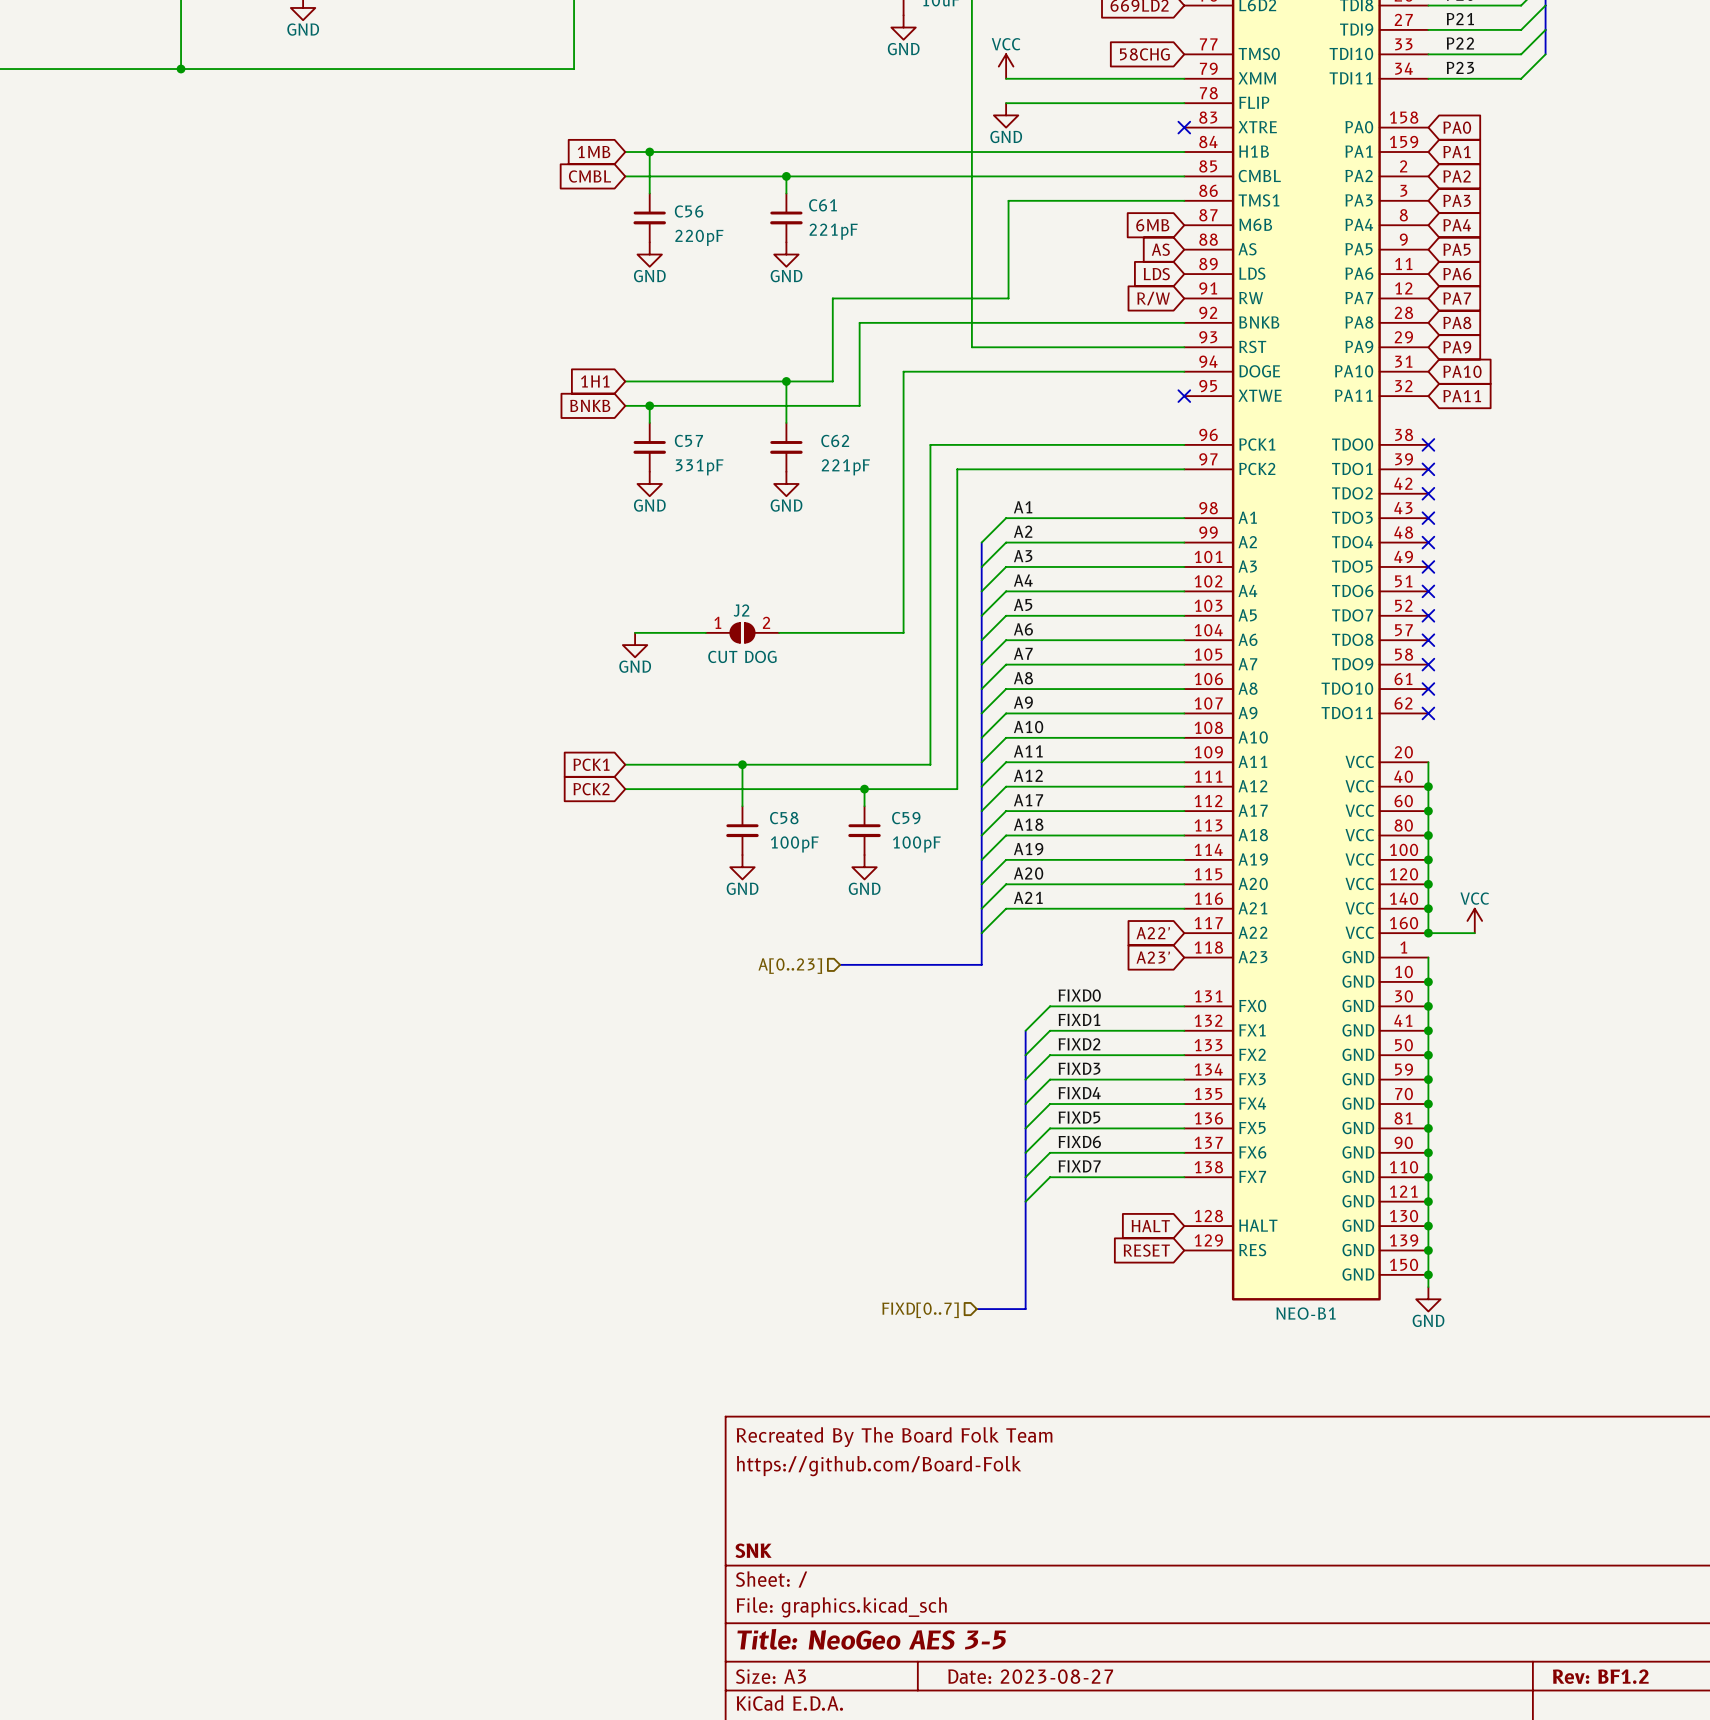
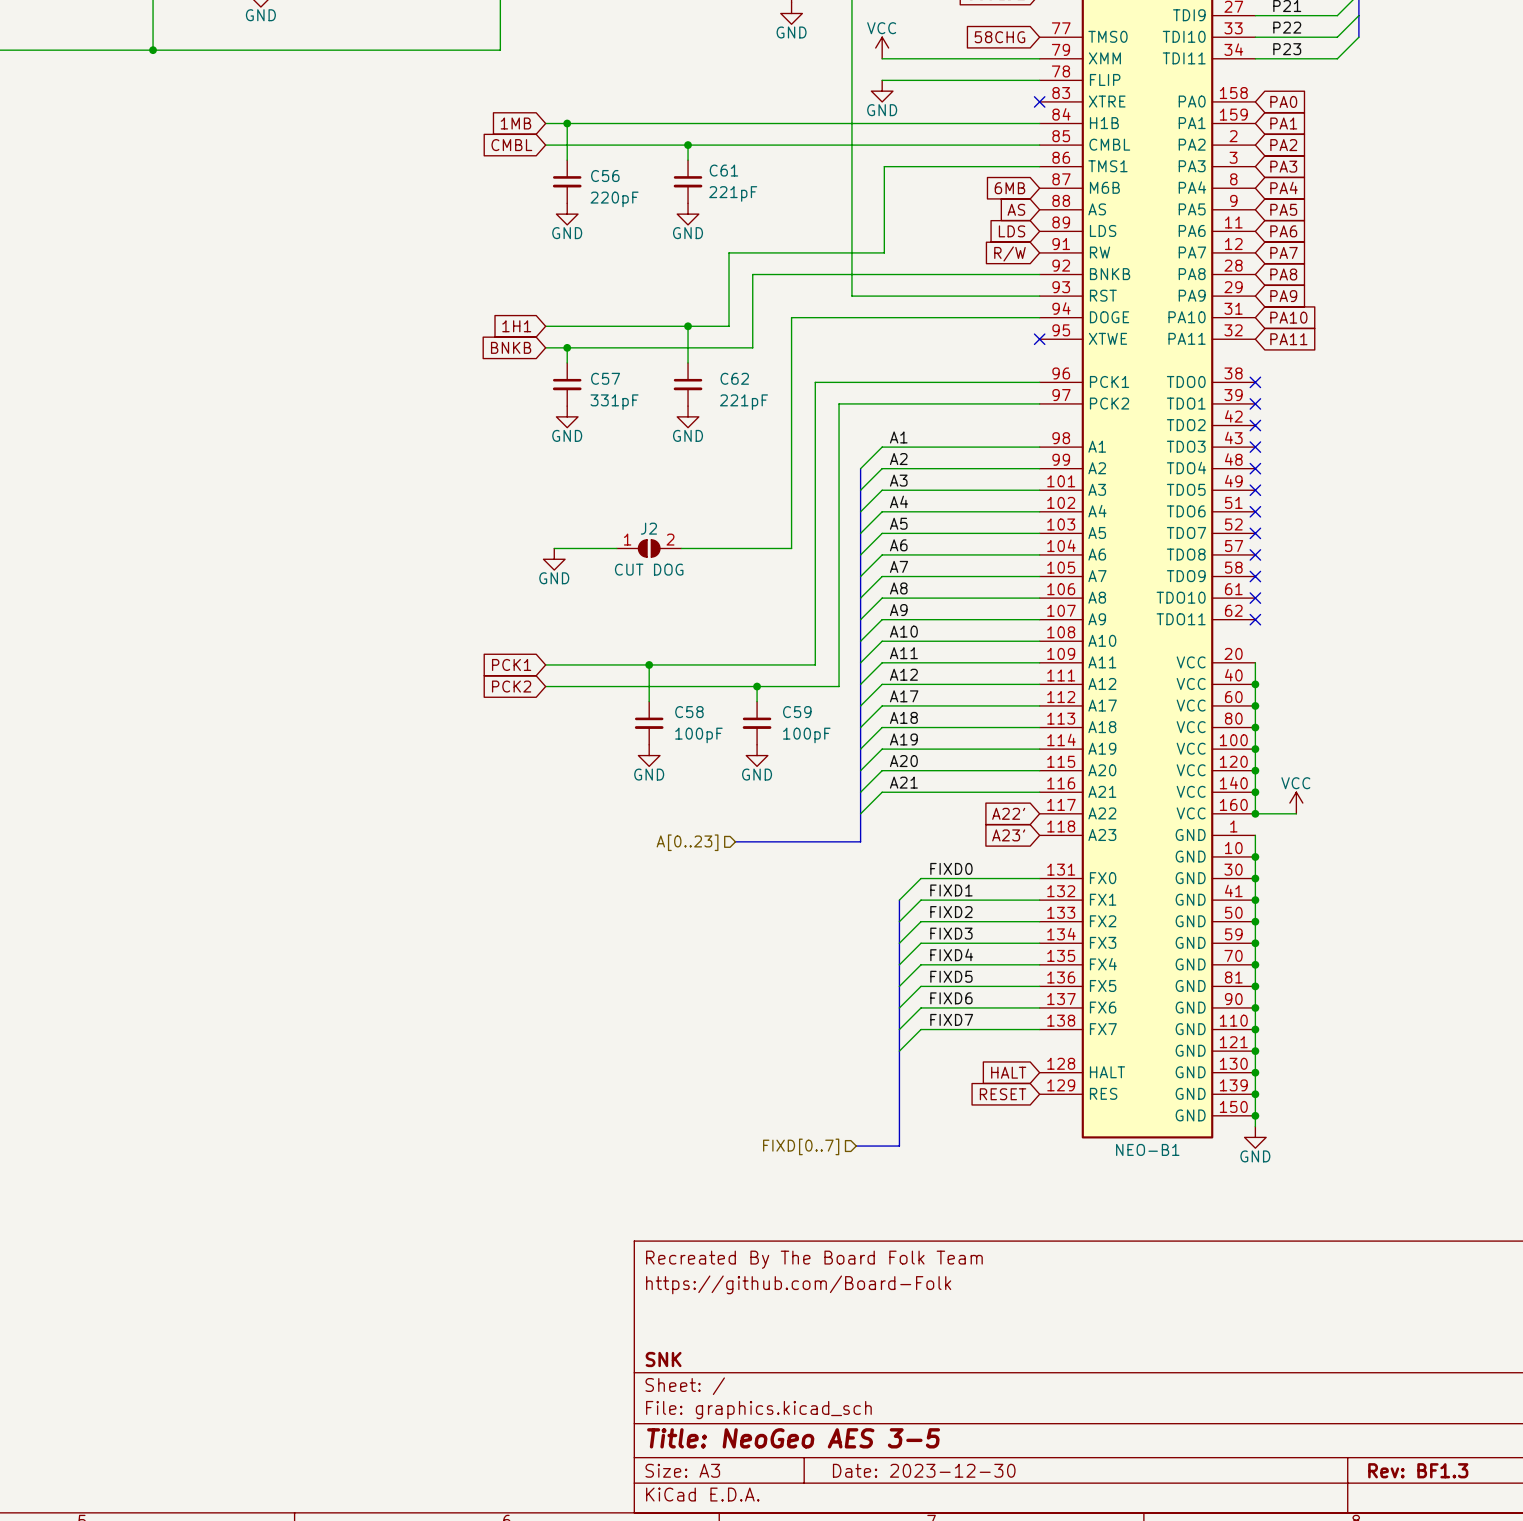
title block: Date: 2023-08-27 (1030, 1676) -> Date: 2023-12-30 (924, 1470)
title block: Rev: BF1.2 (1600, 1676) -> Rev: BF1.3 (1418, 1470)

